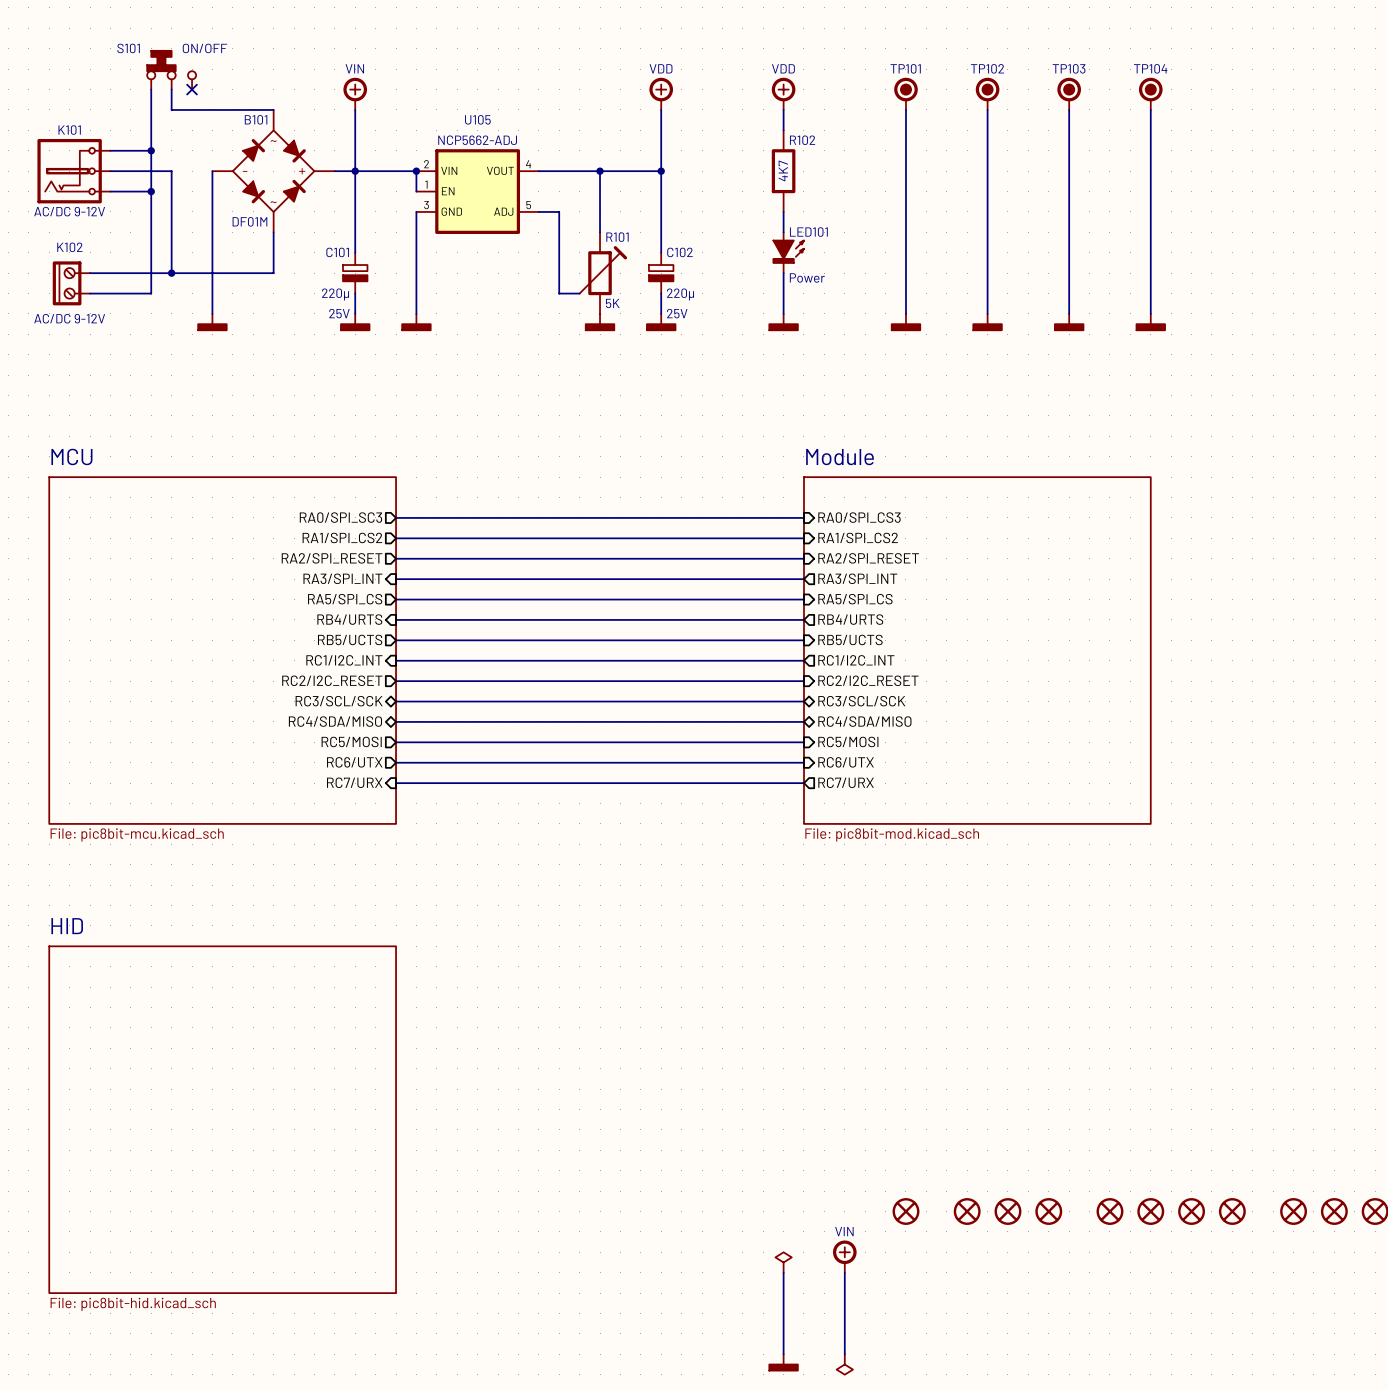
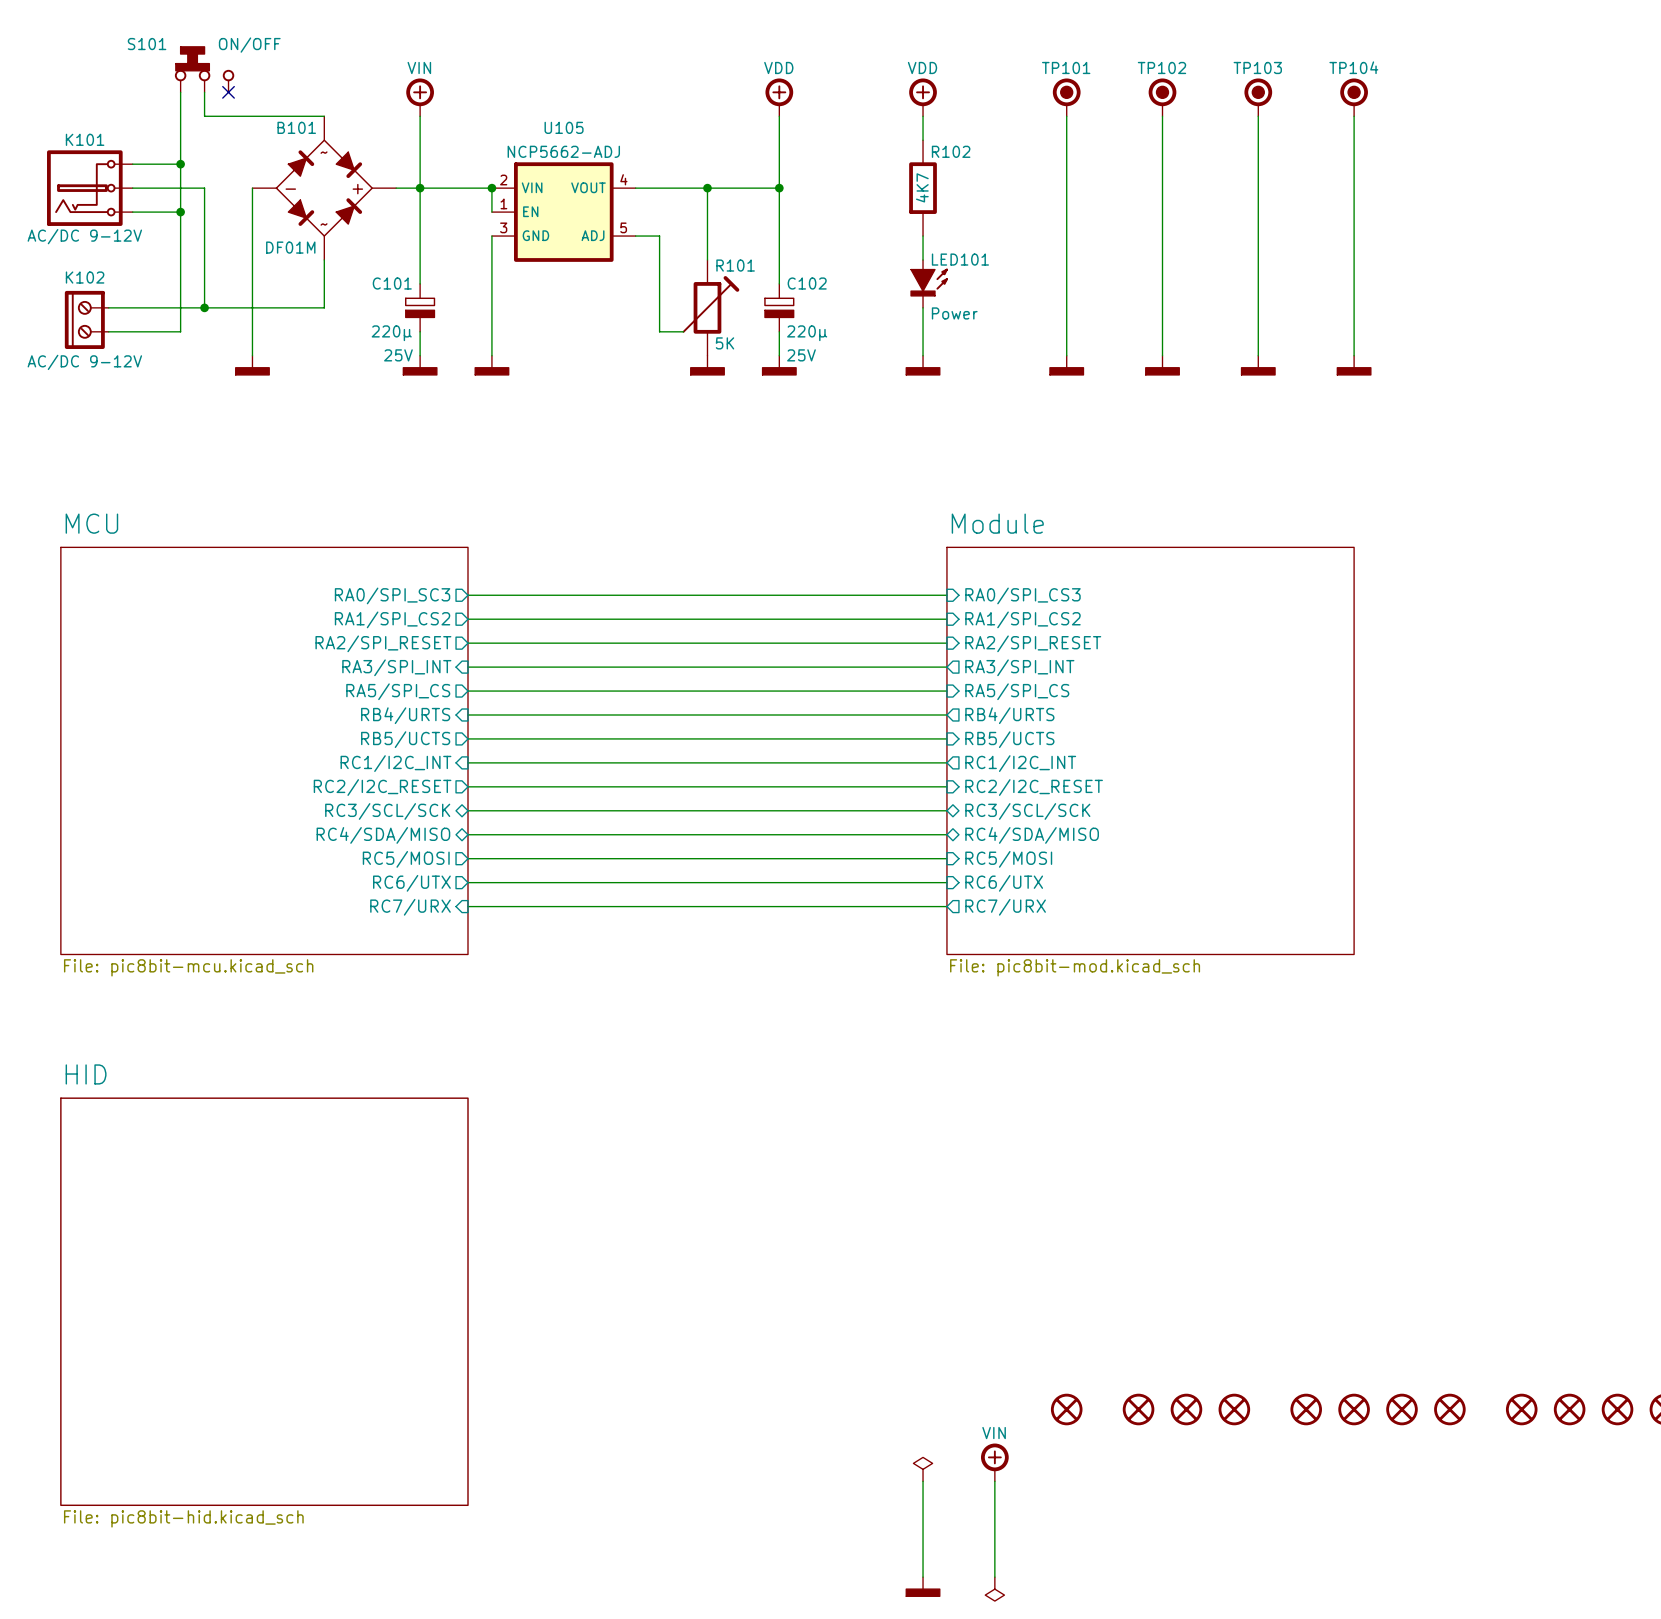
K102 symbol: [52, 261, 91, 306] -> [64, 290, 109, 349]

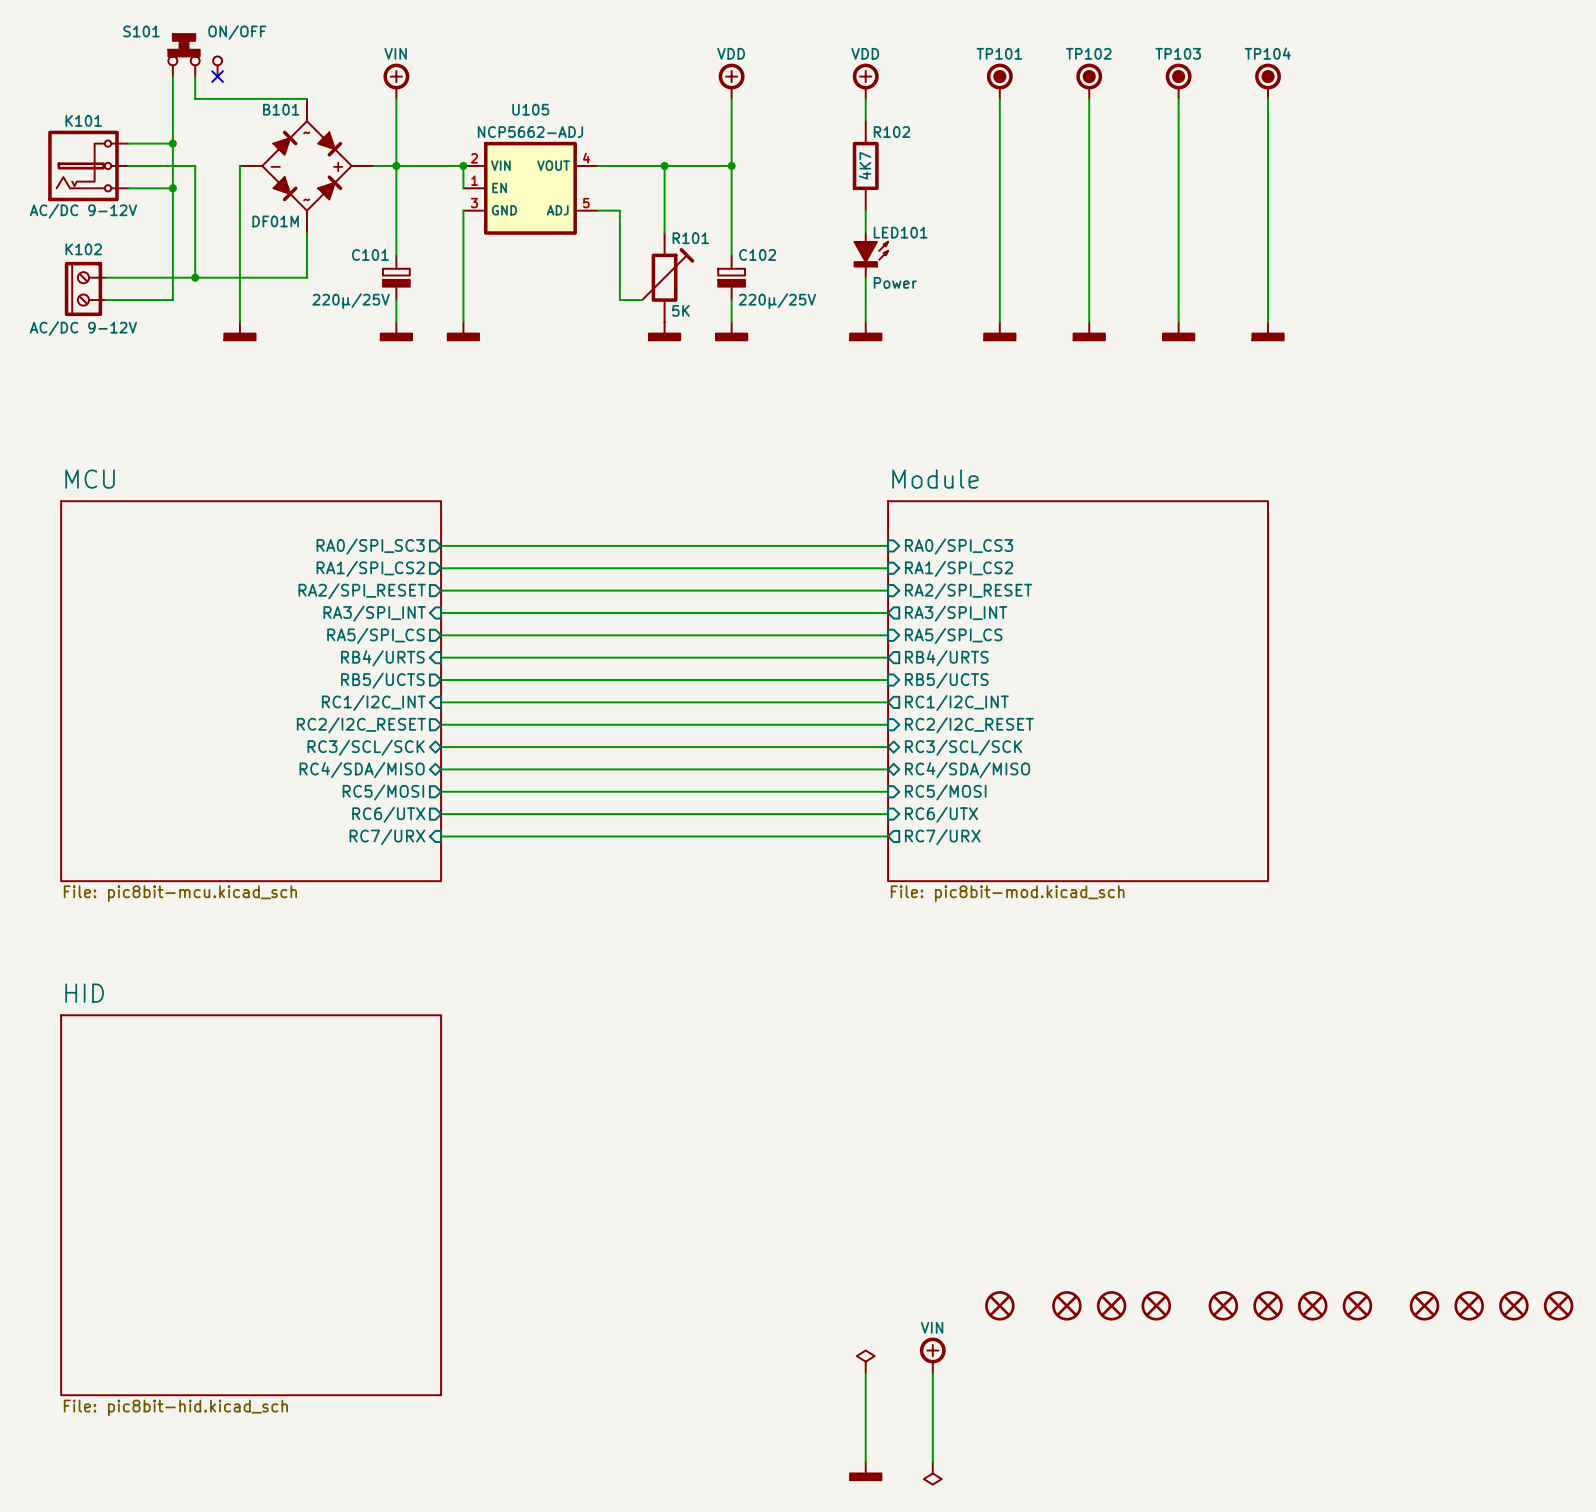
C101 value: 220µ (391, 333) -> 220µ/25V (351, 301)
C102 value: 220µ (807, 333) -> 220µ/25V (777, 301)
C101 text: 25V (398, 355) -> none
C102 text: 25V (801, 355) -> none

